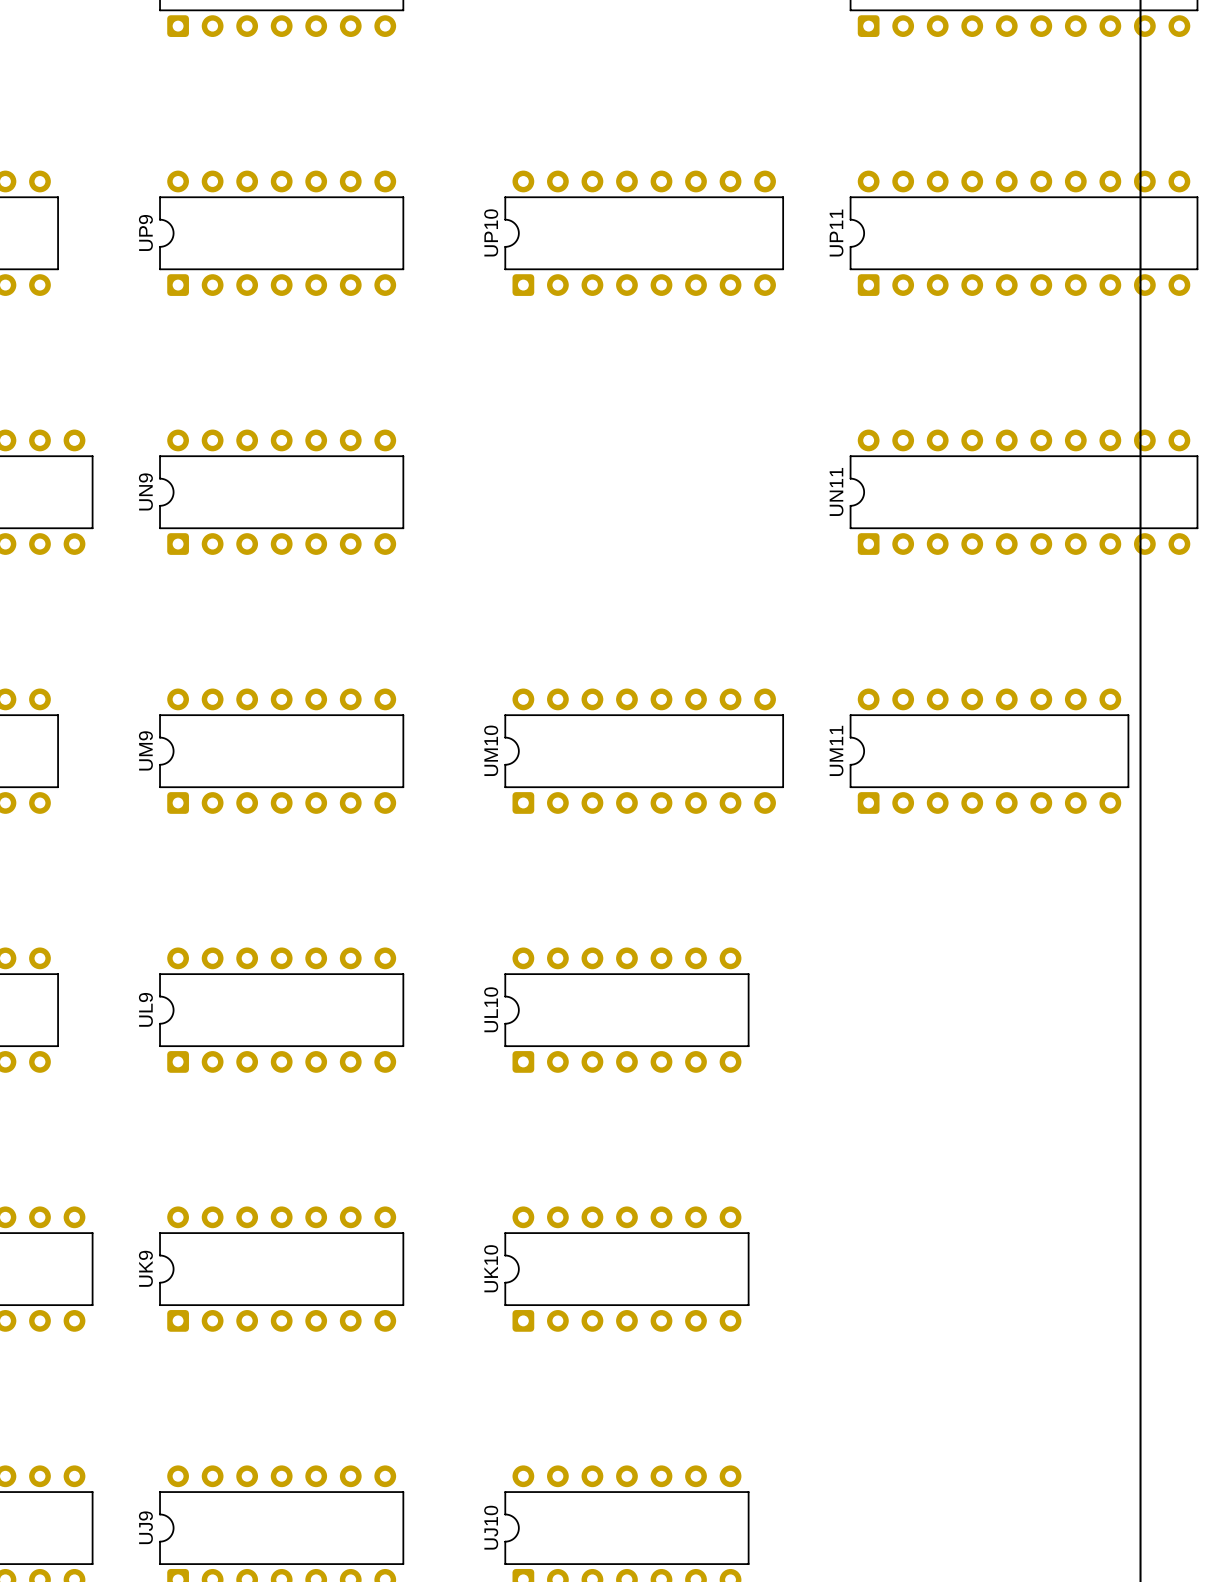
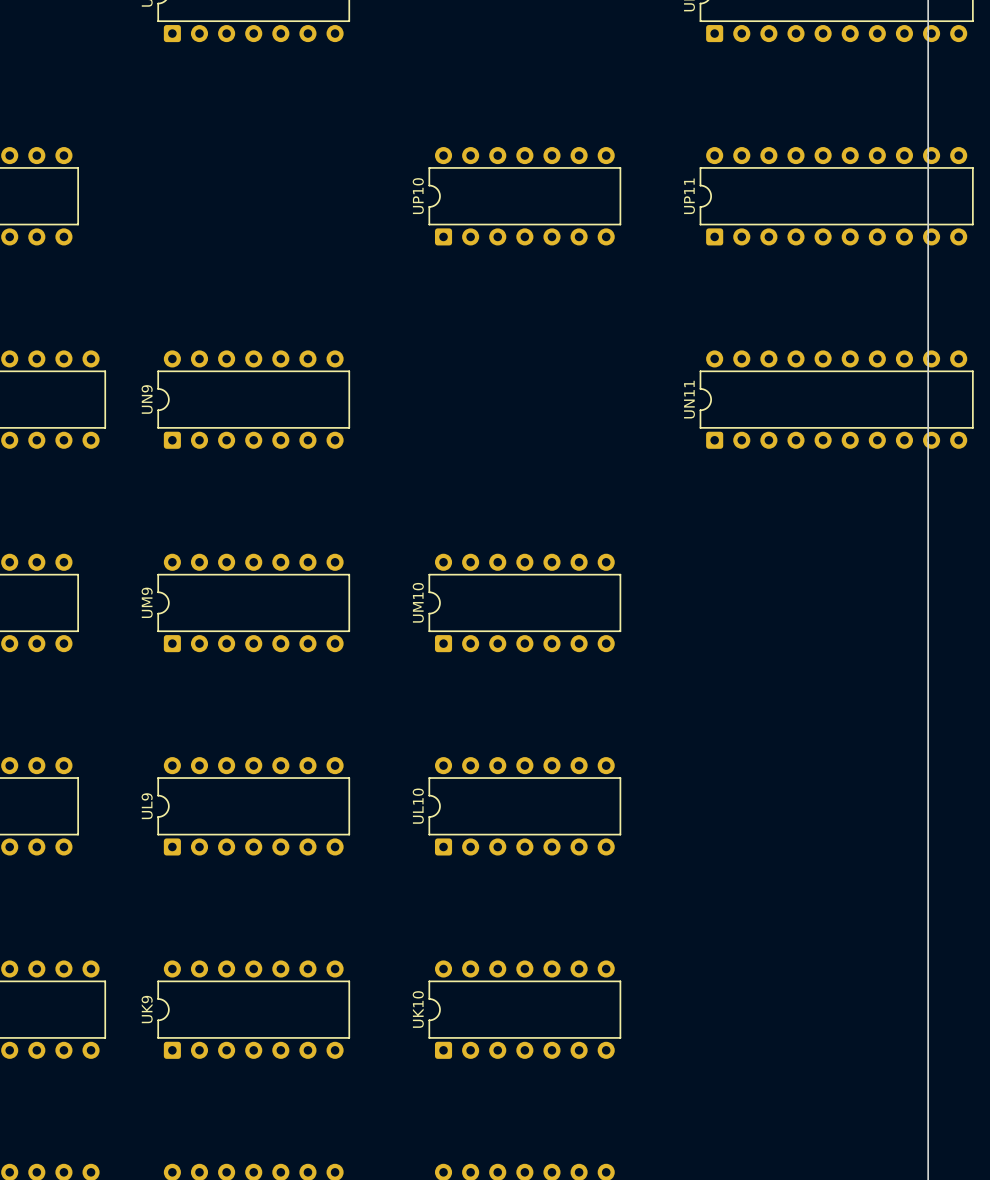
UP10 footprint: [504, 170, 784, 296] -> [428, 147, 622, 246]
UP9: (281, 233) -> none
UM10 footprint: [504, 688, 784, 814] -> [428, 553, 622, 653]
UM11: (989, 751) -> none

